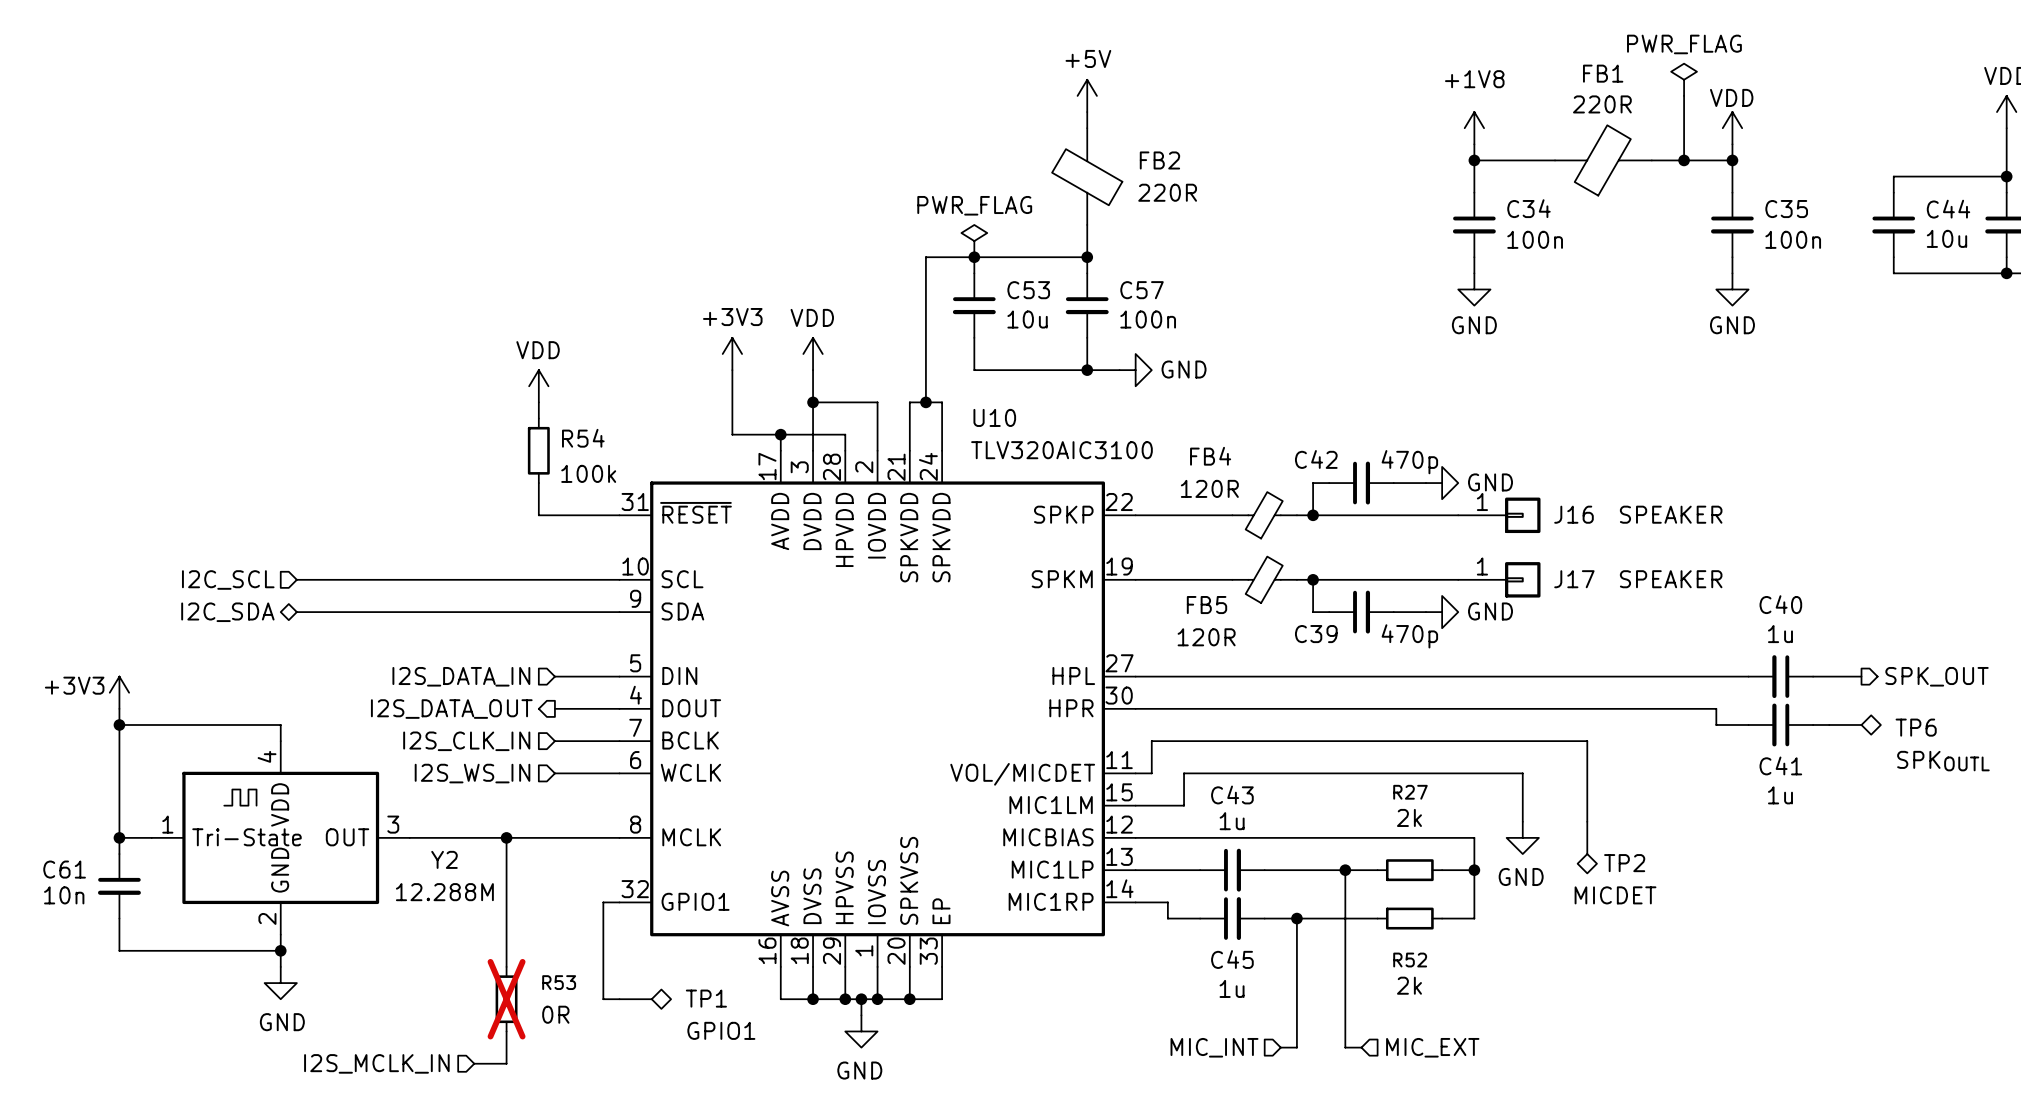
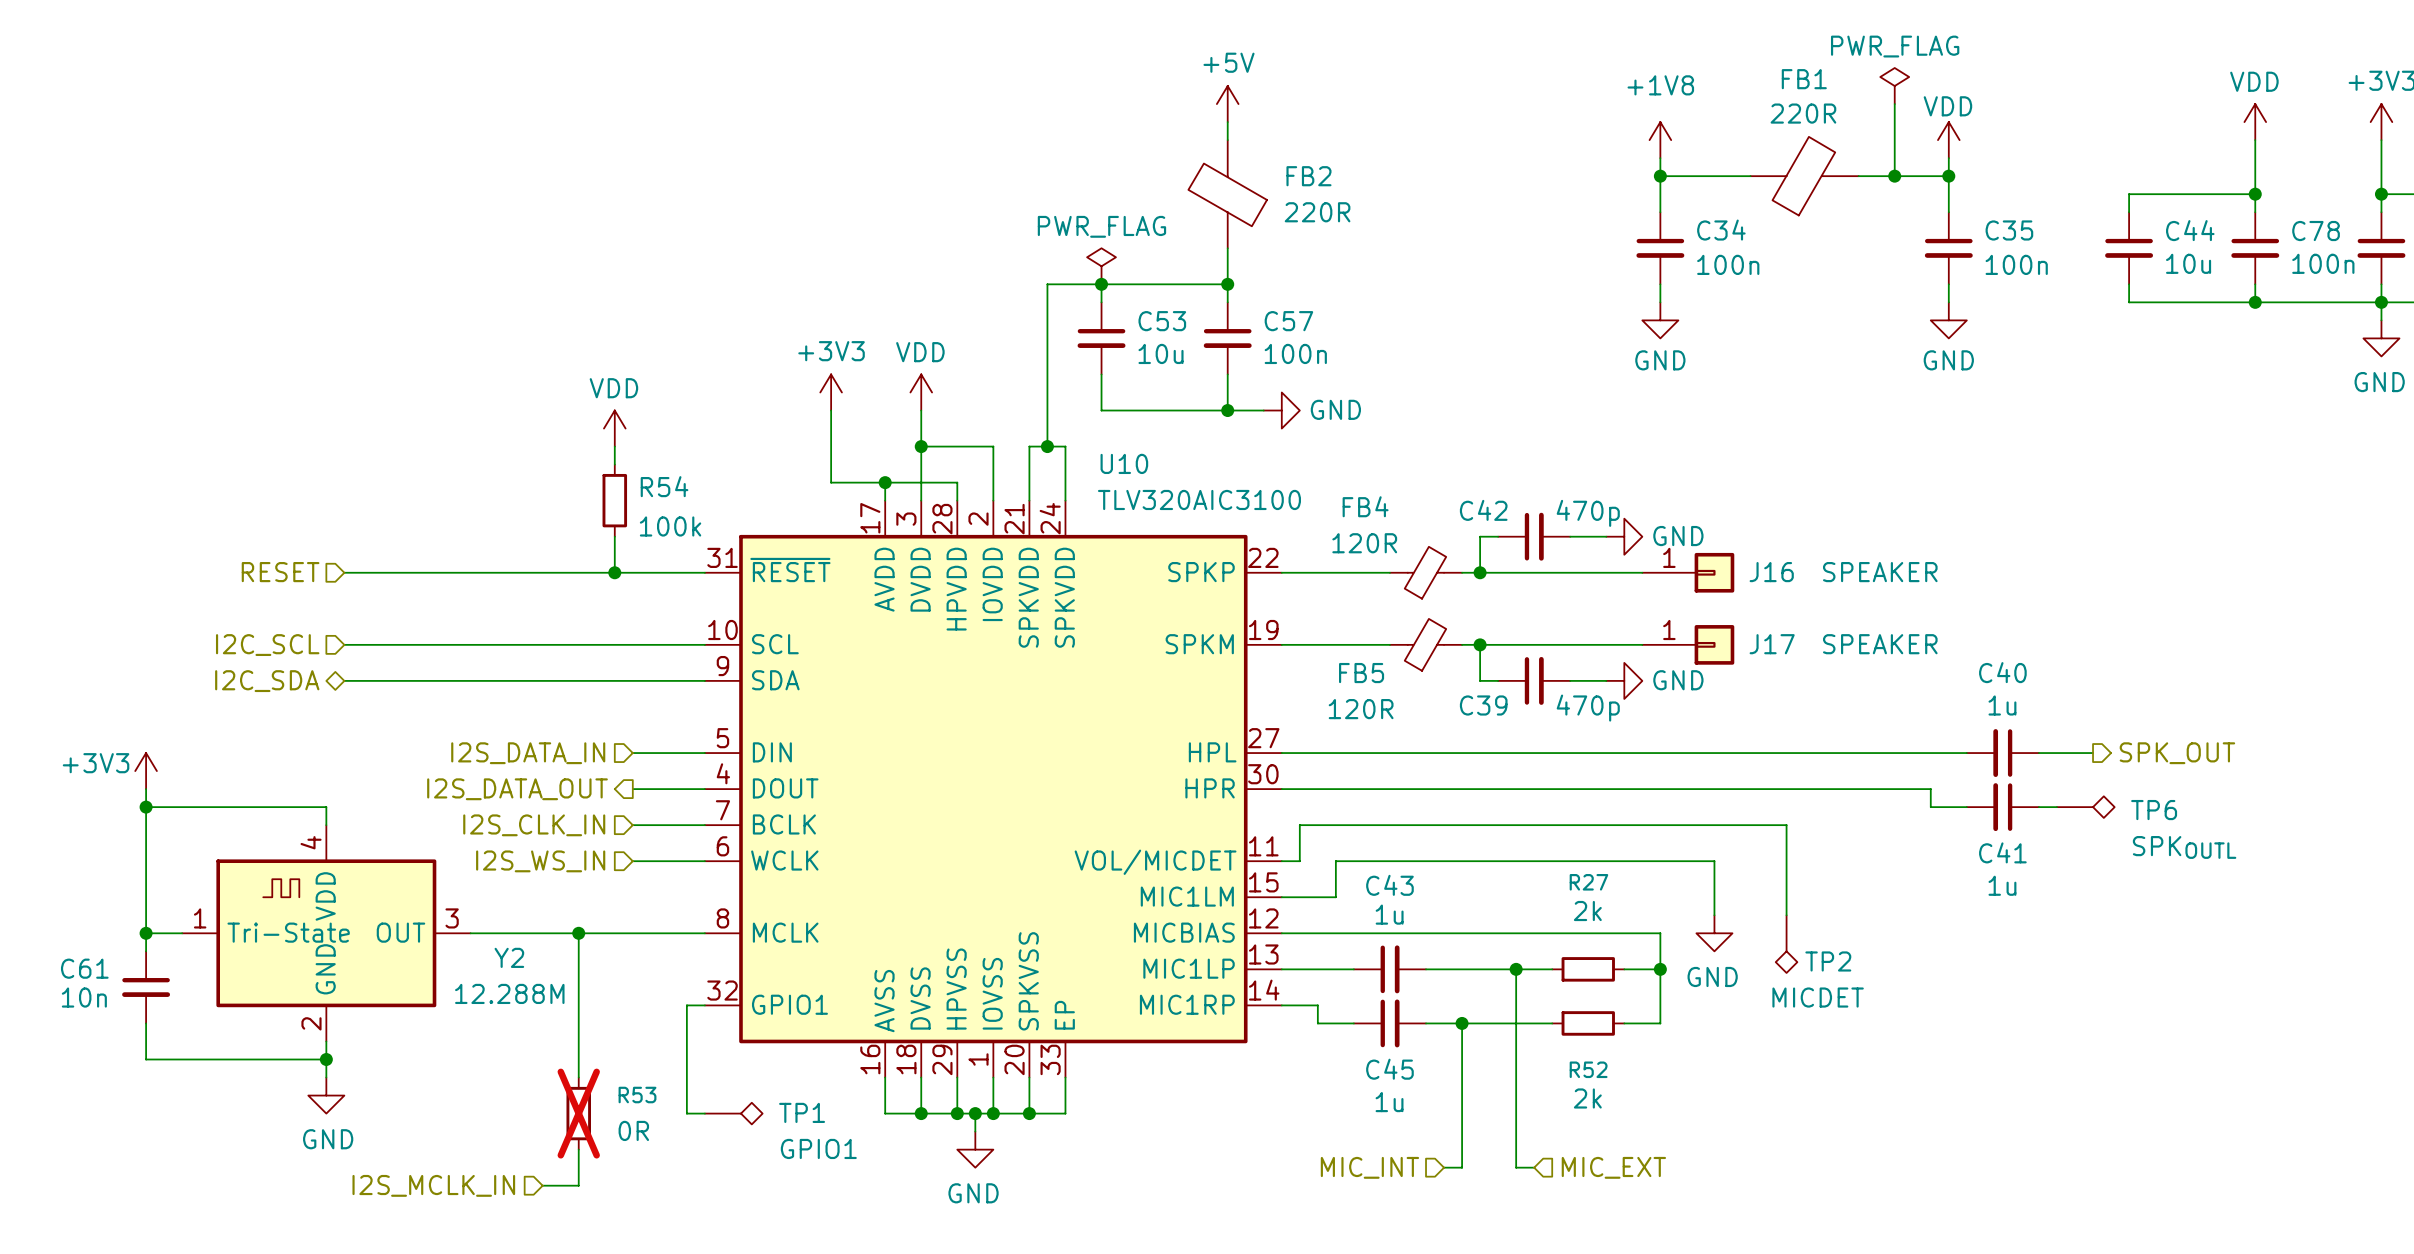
hierarchical label: none -> RESET (280, 572)
wire: none -> (344, 572) (614, 572)
junction: none -> (614, 572)

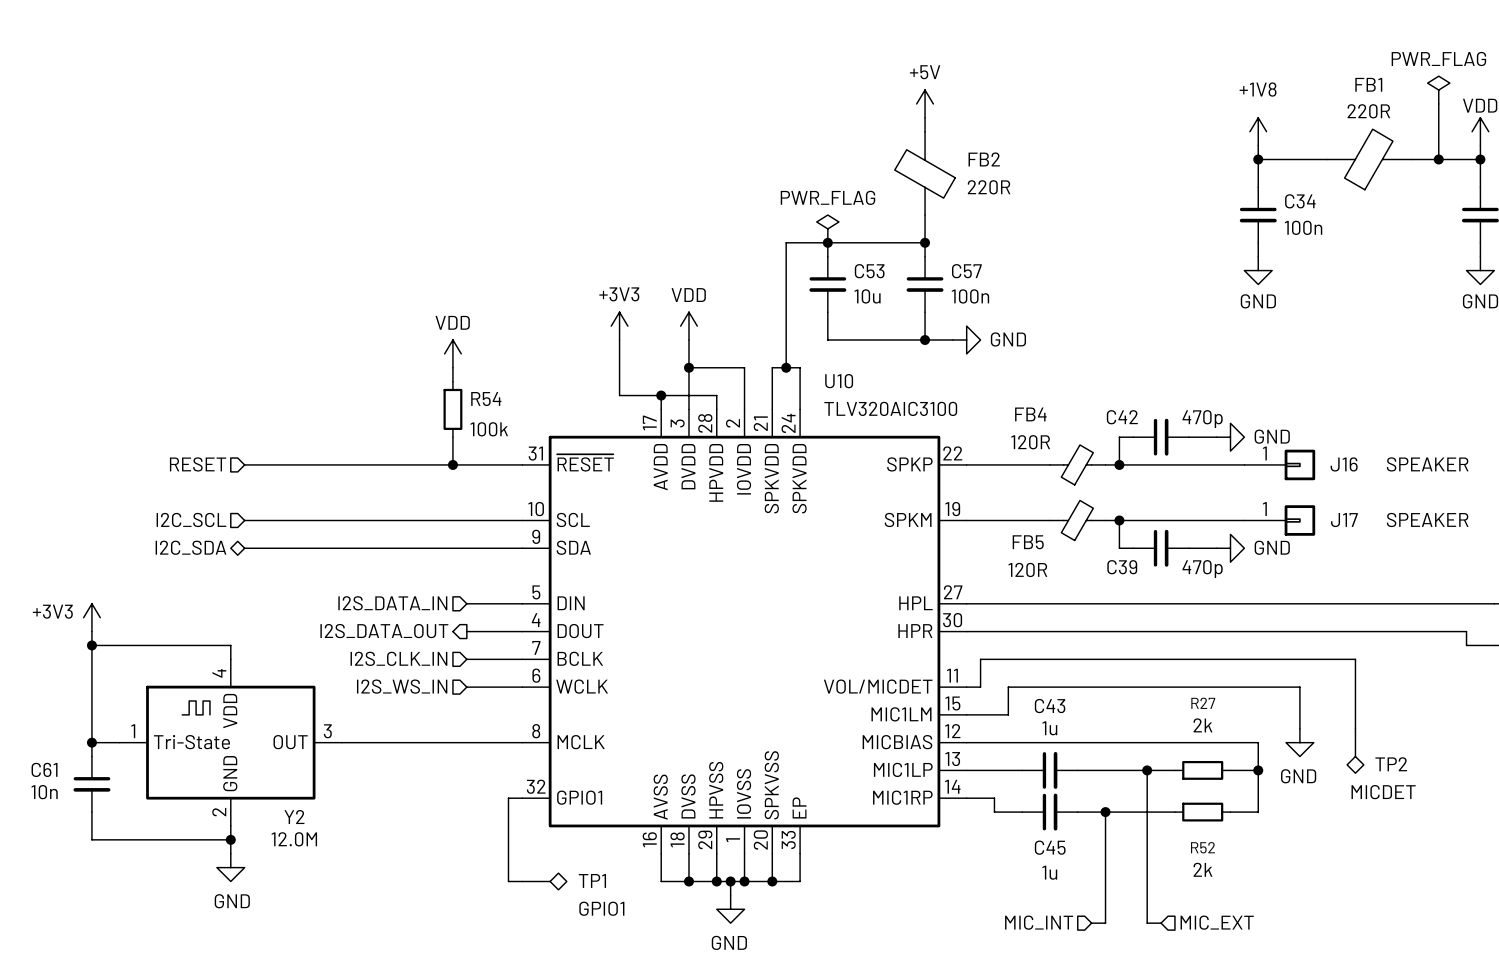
wire: (578, 933) (578, 1077) -> none
junction: (578, 933) -> none
Y2 name position: Y2 (509, 957) -> Y2 (294, 817)
Y2 value: 12.288M (509, 993) -> 12.0M (294, 839)
R53: 0R (578, 1113) -> none
wire: (578, 1149) (578, 1185) (542, 1185) -> none
hierarchical label: I2S_MCLK_IN (433, 1185) -> none

